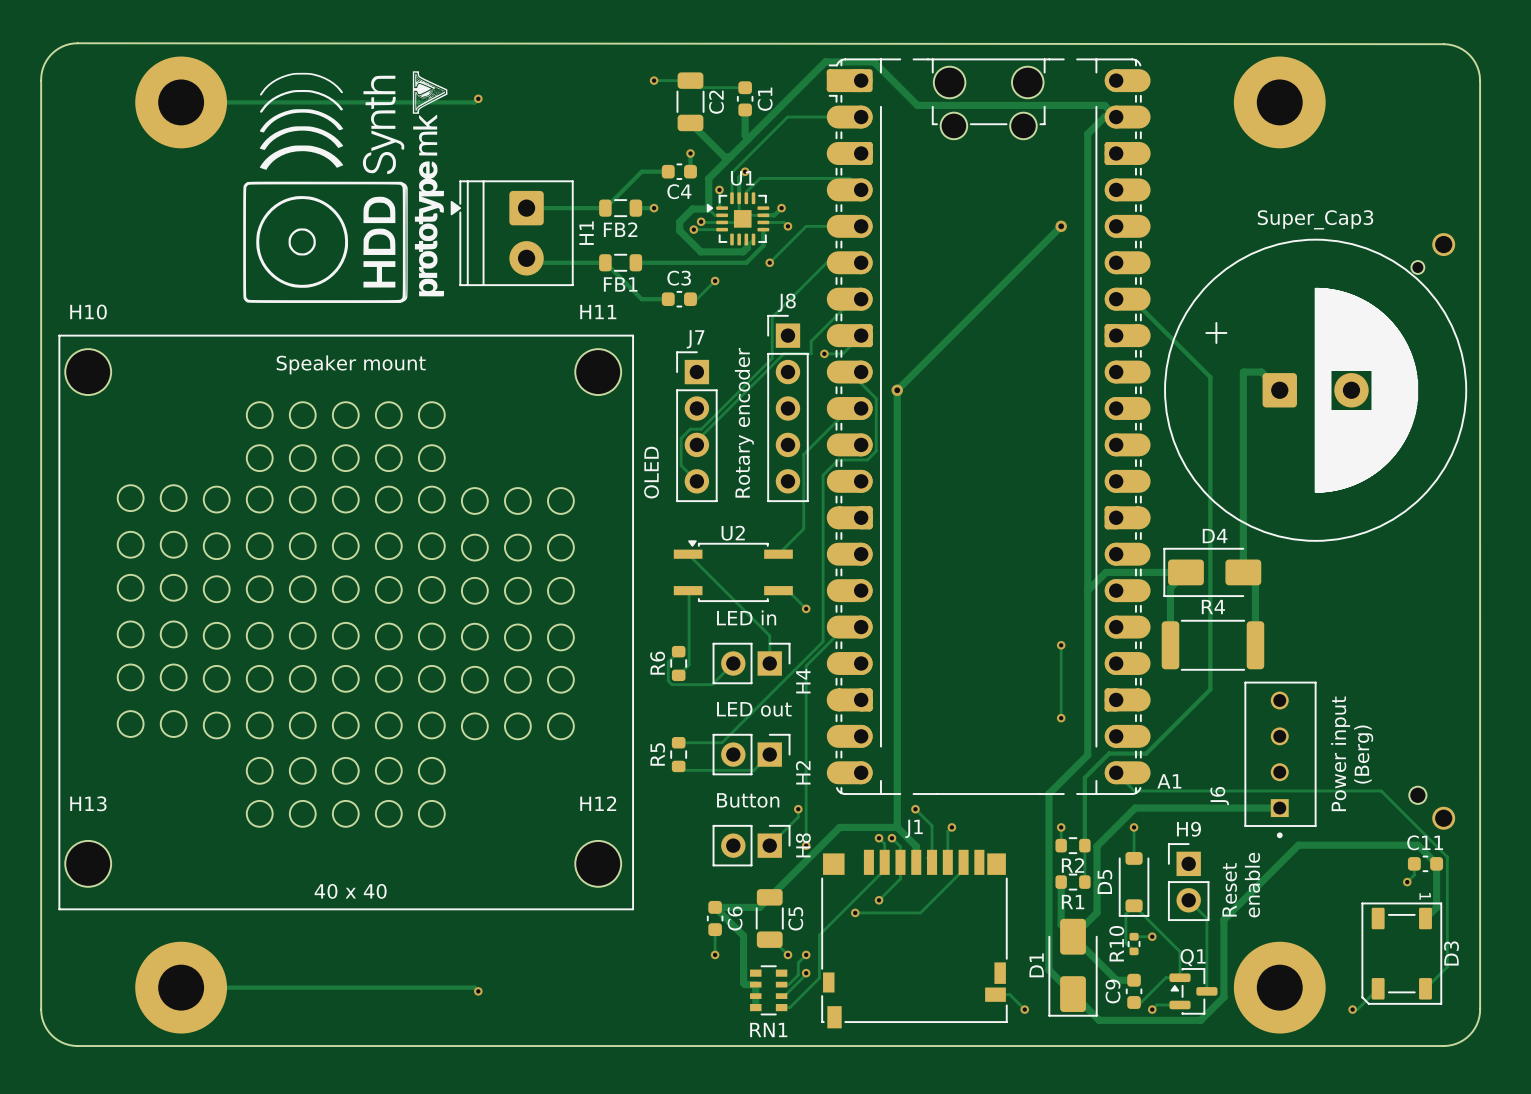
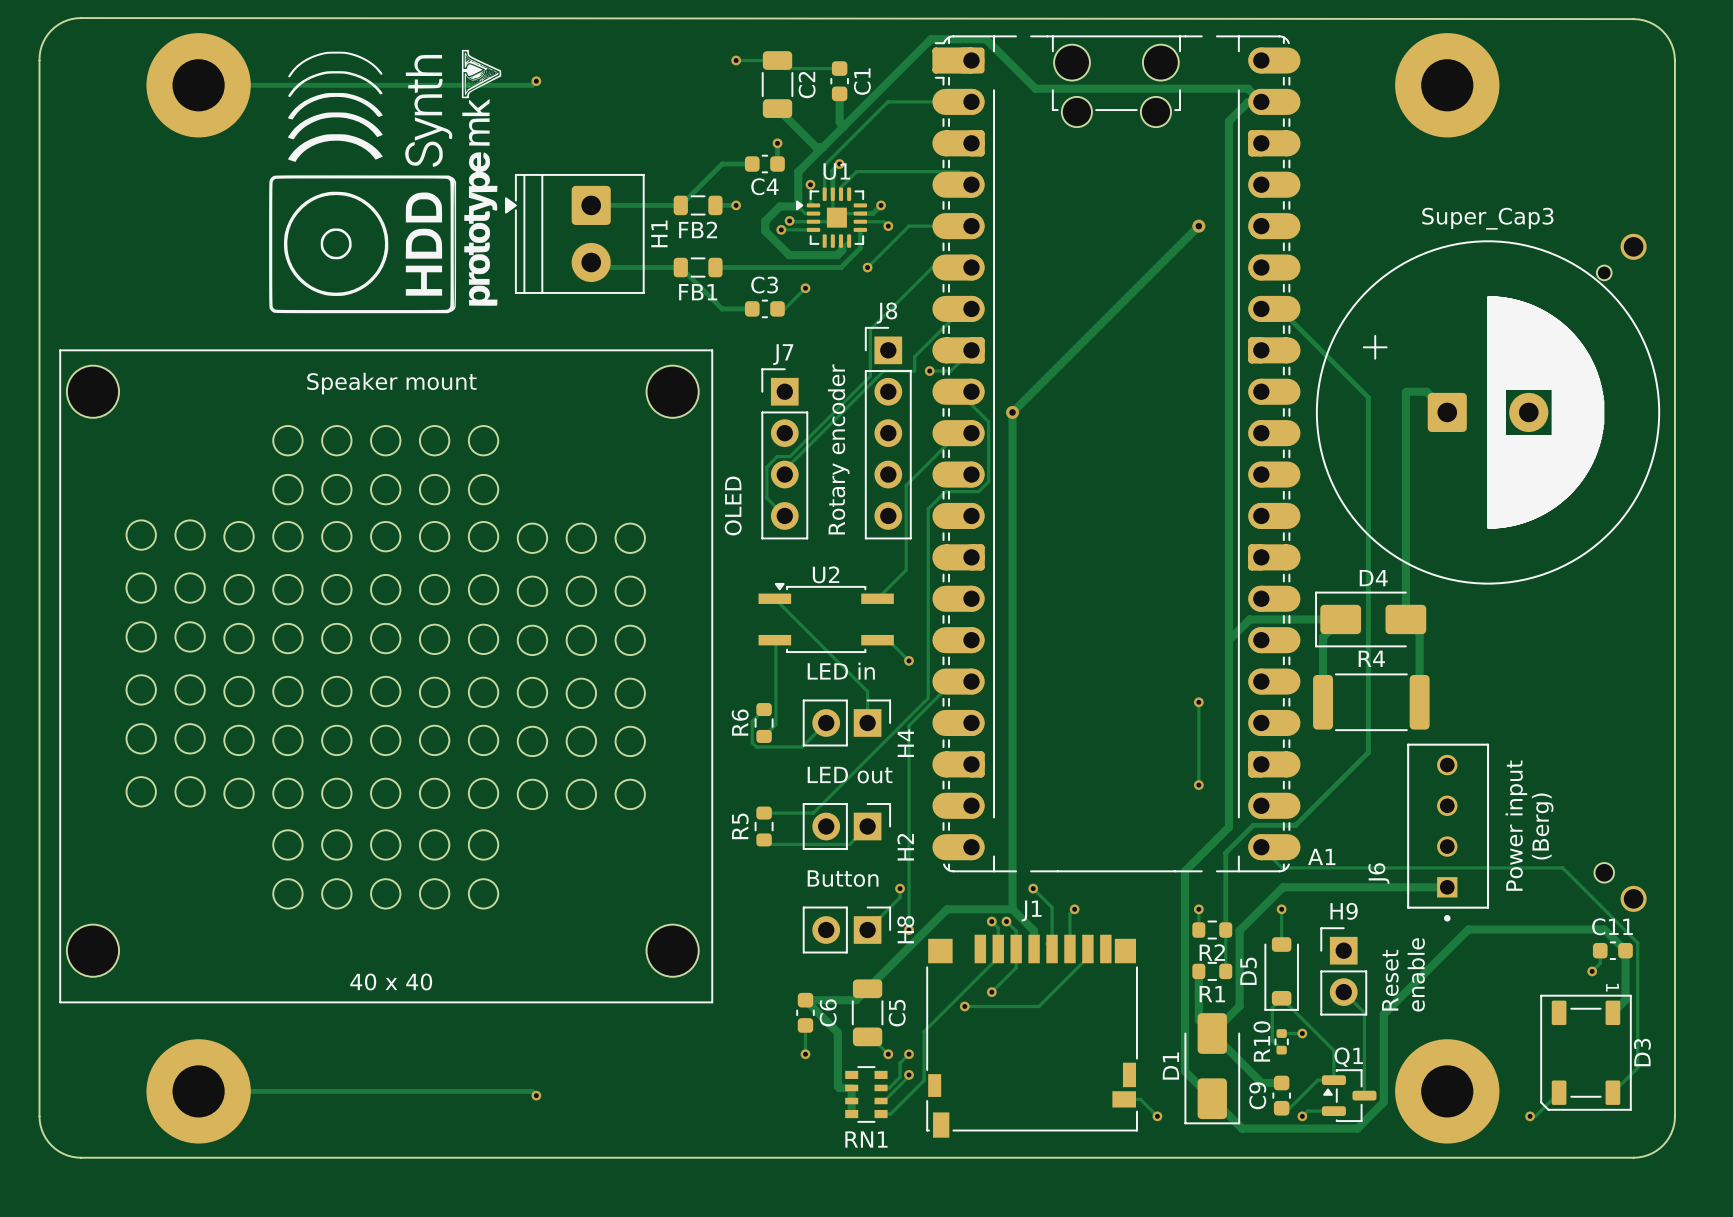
H10 name: H10 (88, 312) -> none
H11 name: H11 (598, 312) -> none
H13 name: H13 (88, 803) -> none
H12 name: H12 (598, 803) -> none

